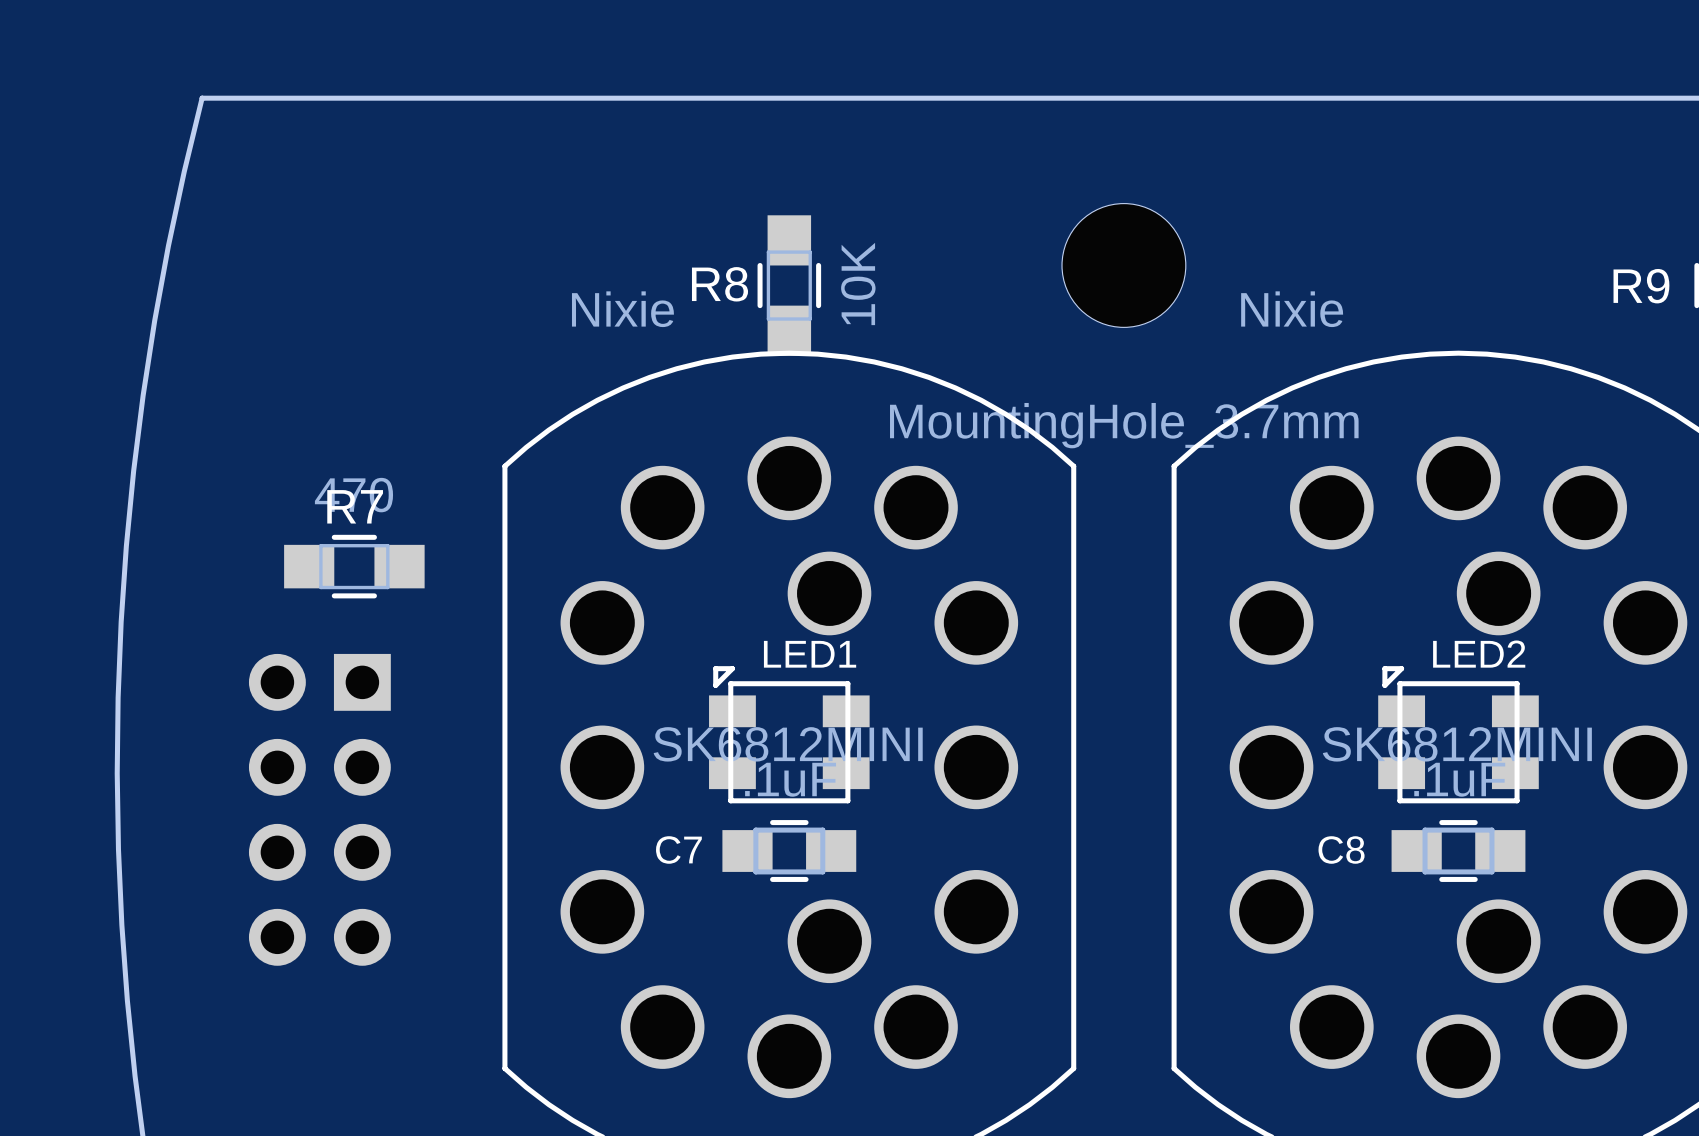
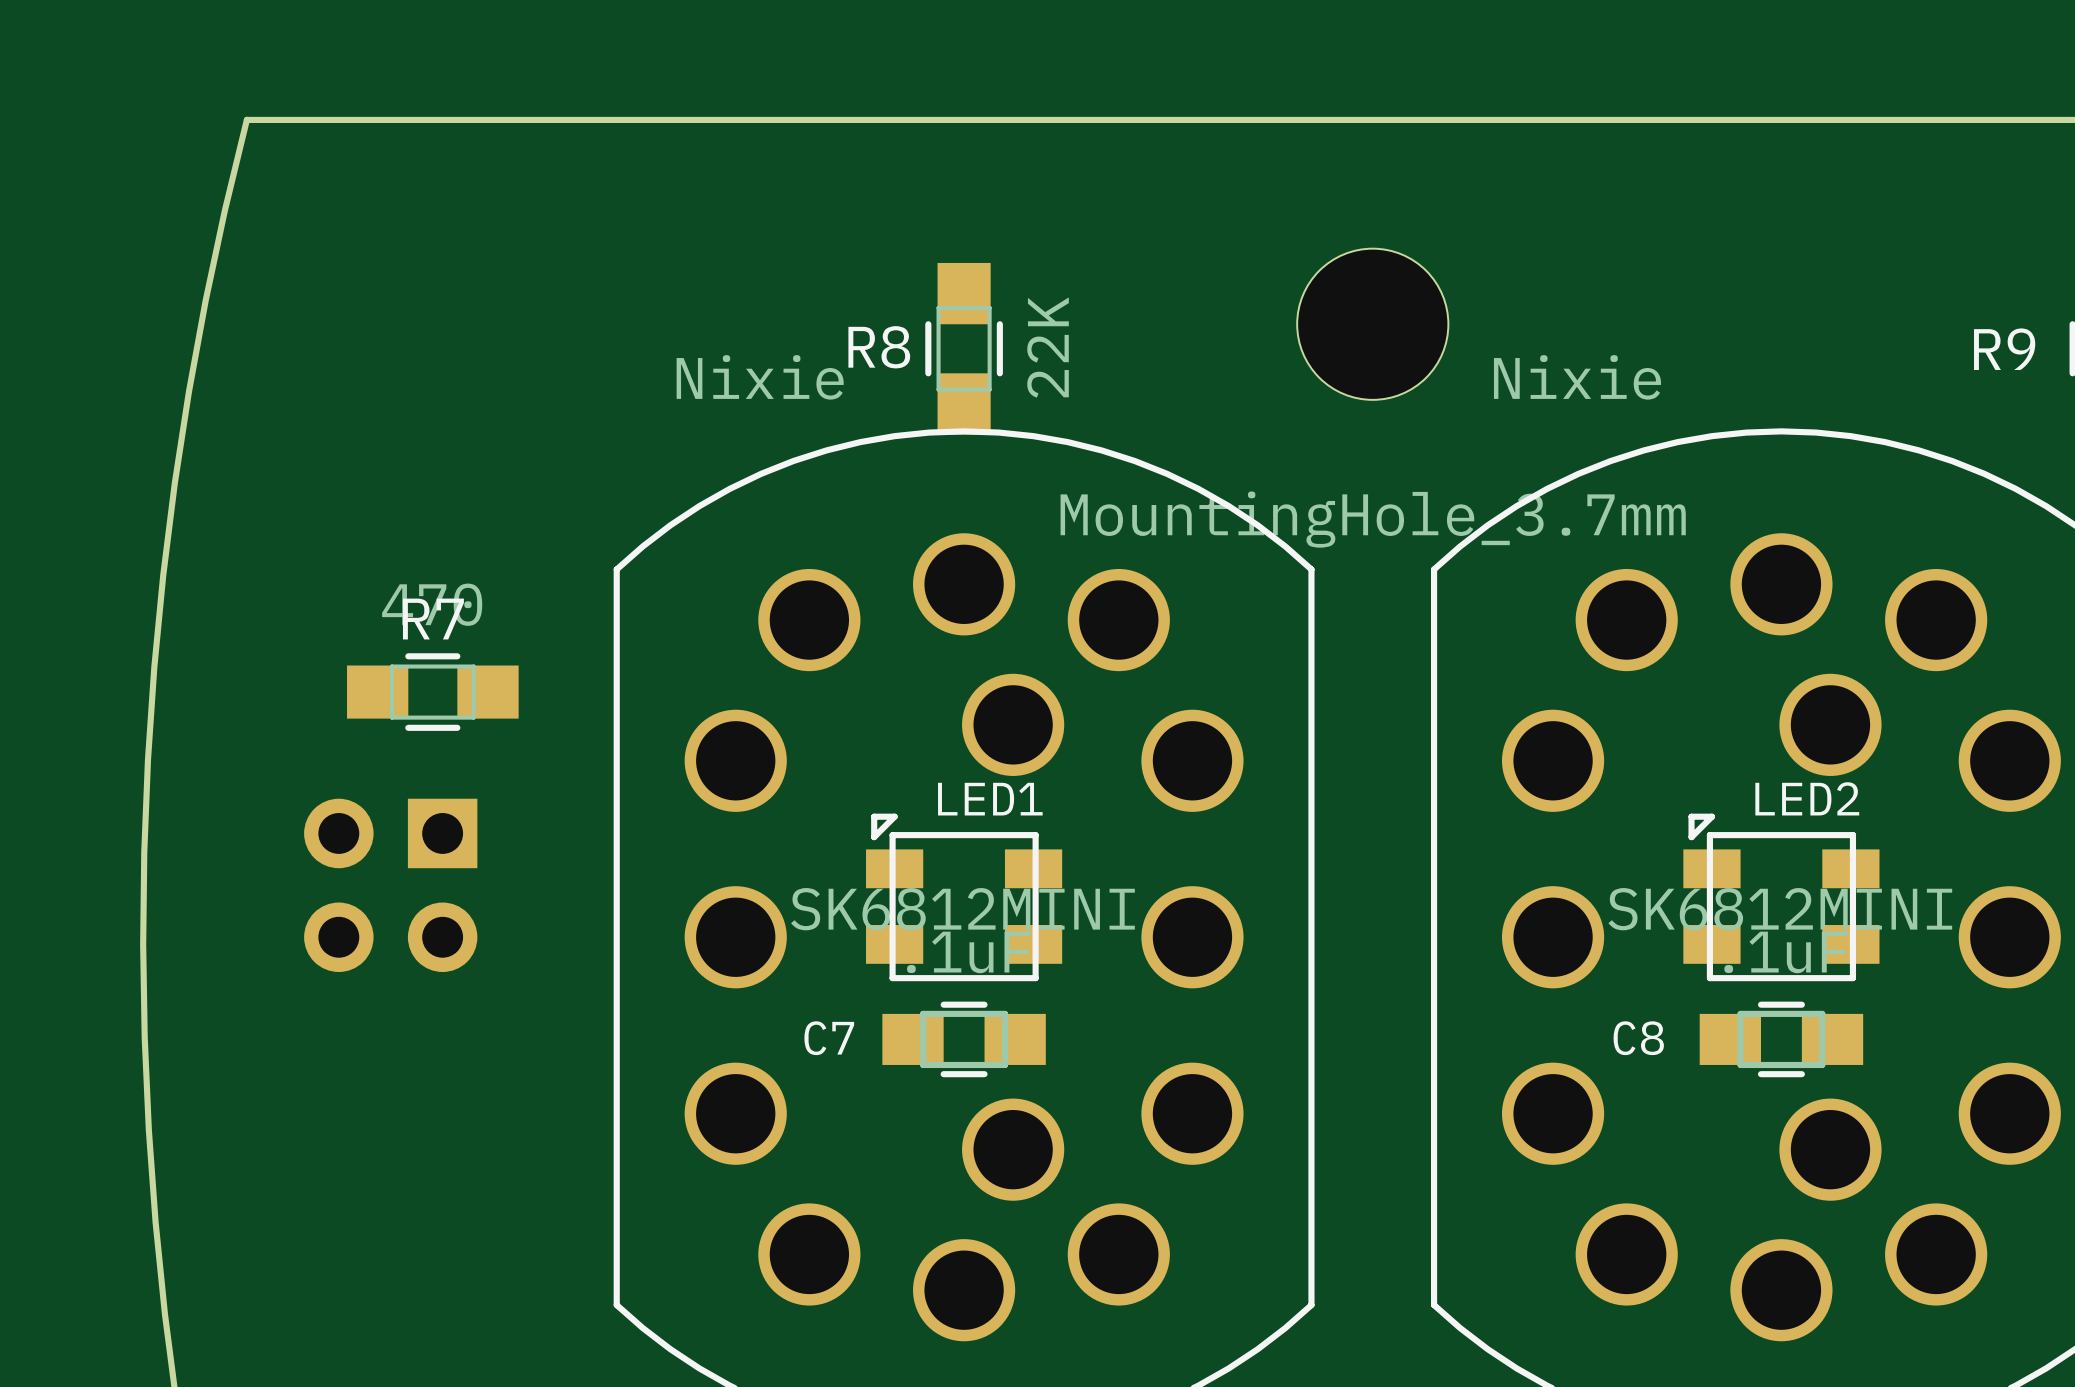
R8 value: 10K (858, 283) -> 22K (1048, 347)
part: (319, 809) -> none

